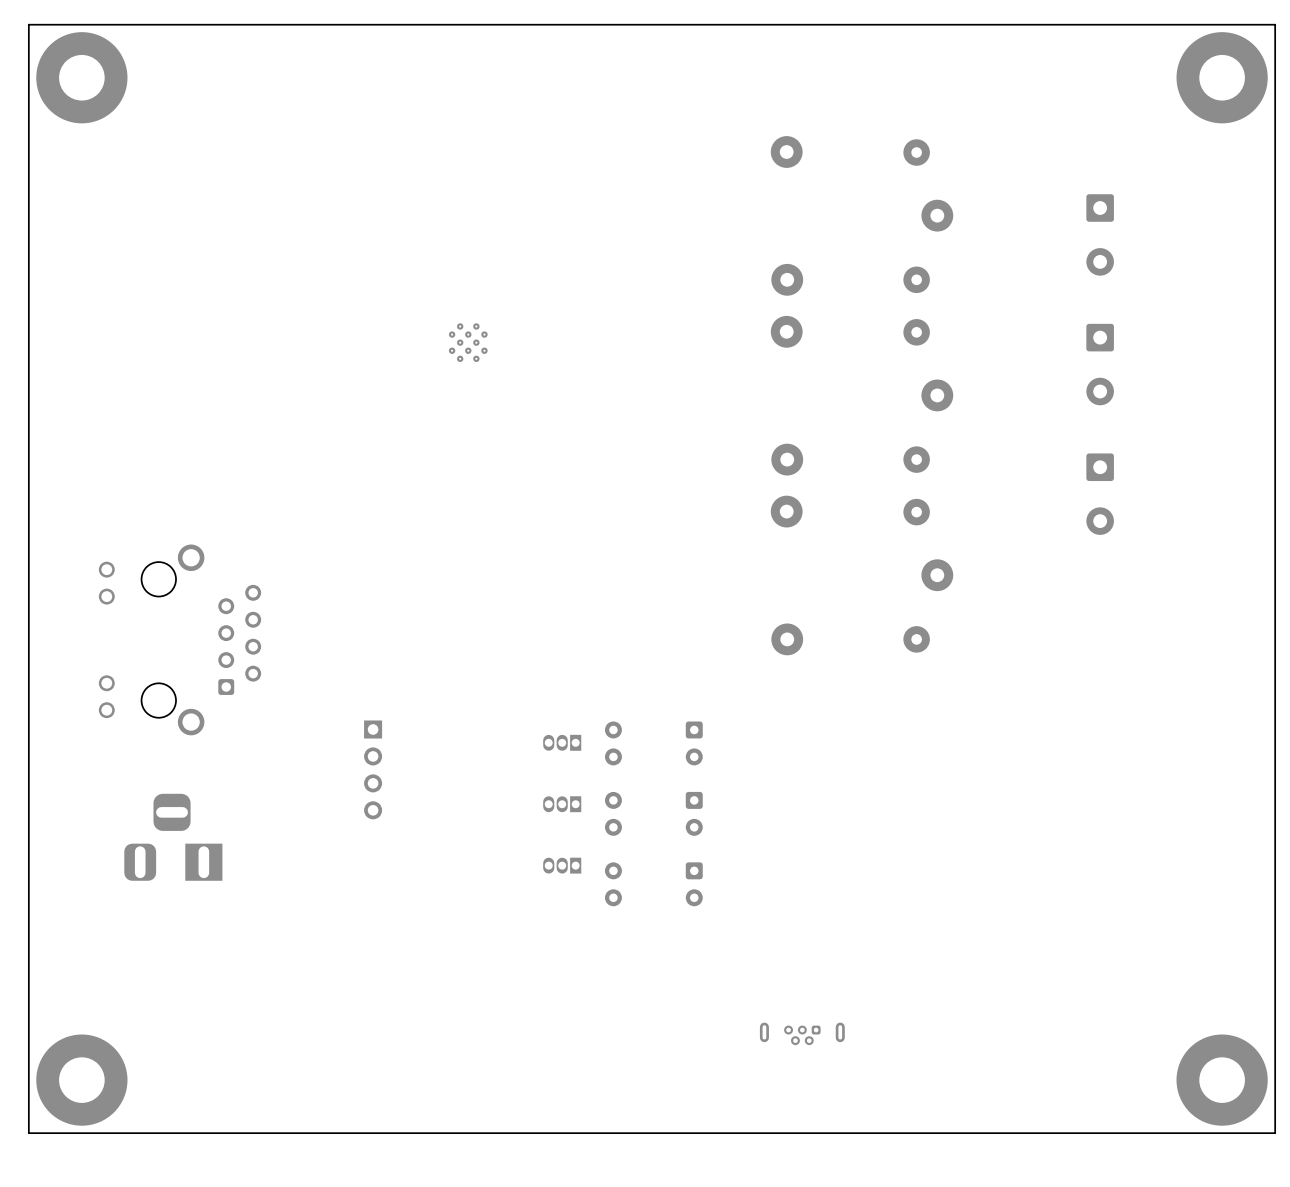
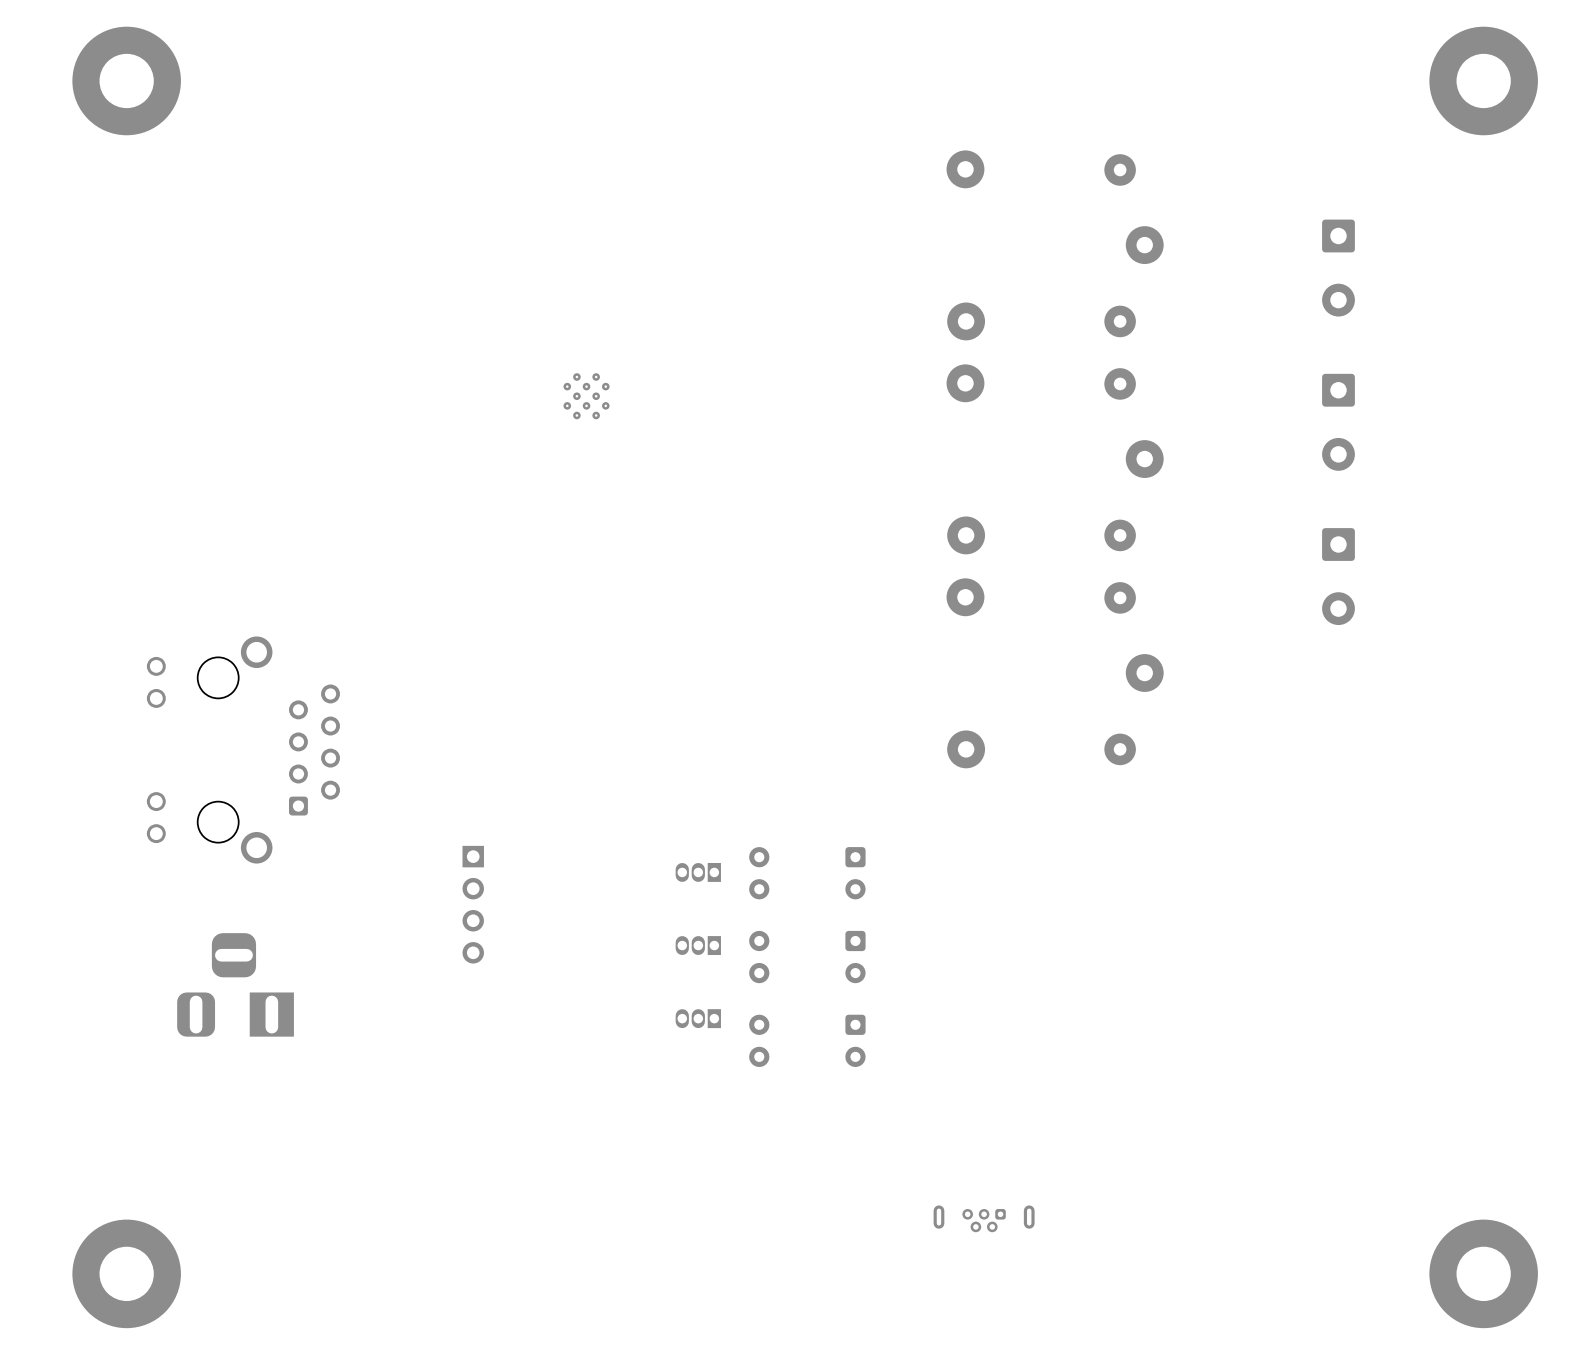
board edge: (1275, 24) (28, 24) (28, 1133) (1275, 1133) (1275, 24) -> none

